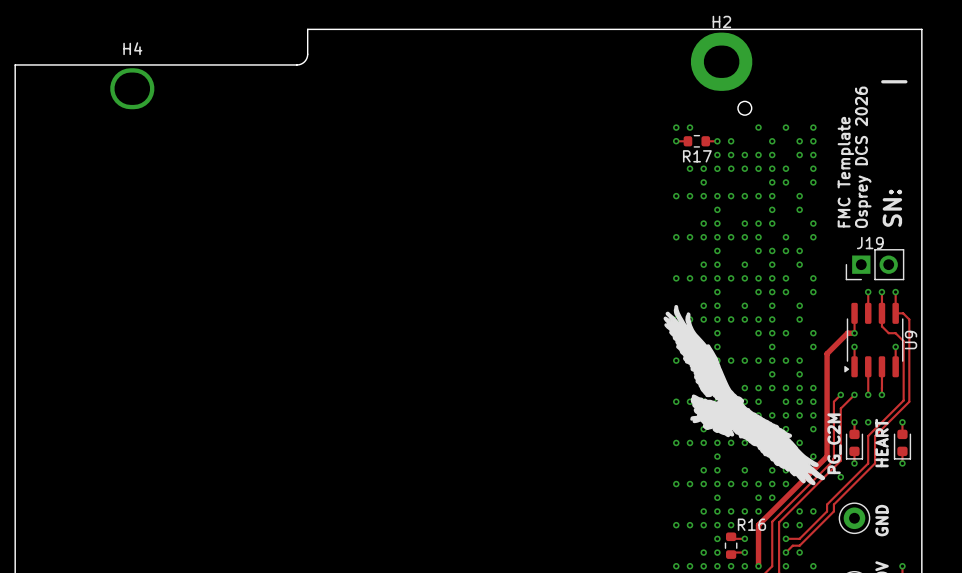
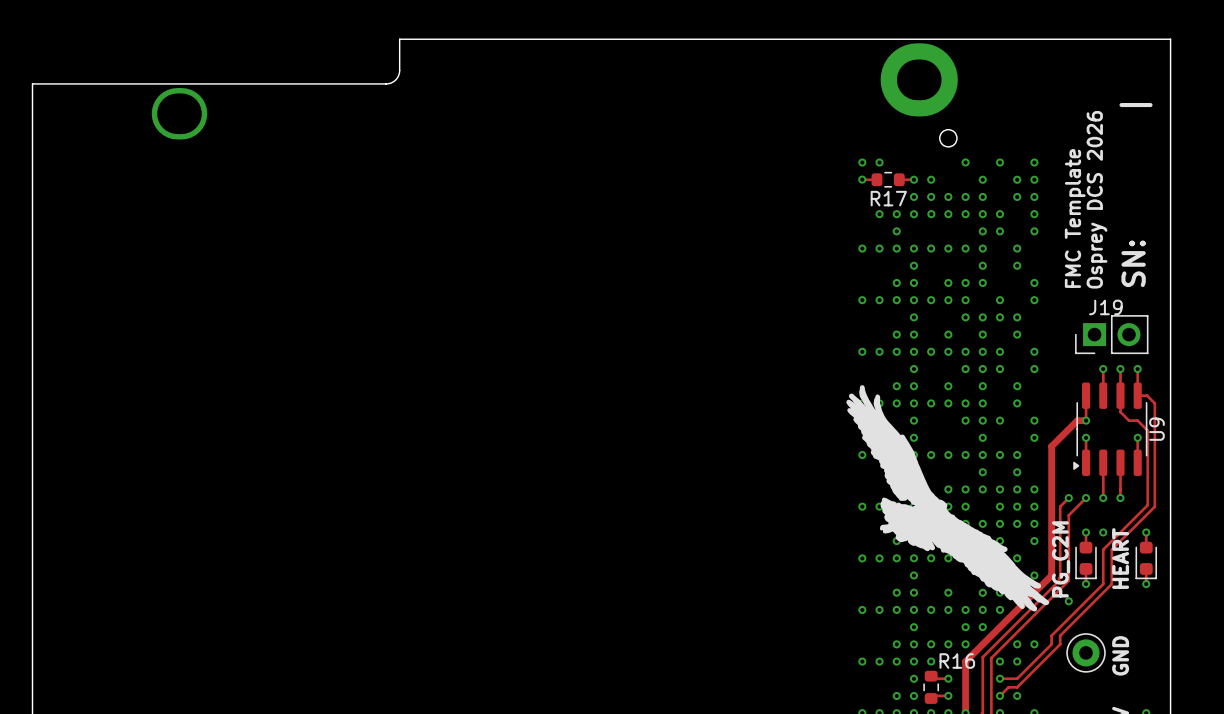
H2 name: H2 (721, 21) -> none
H4 name: H4 (132, 48) -> none

